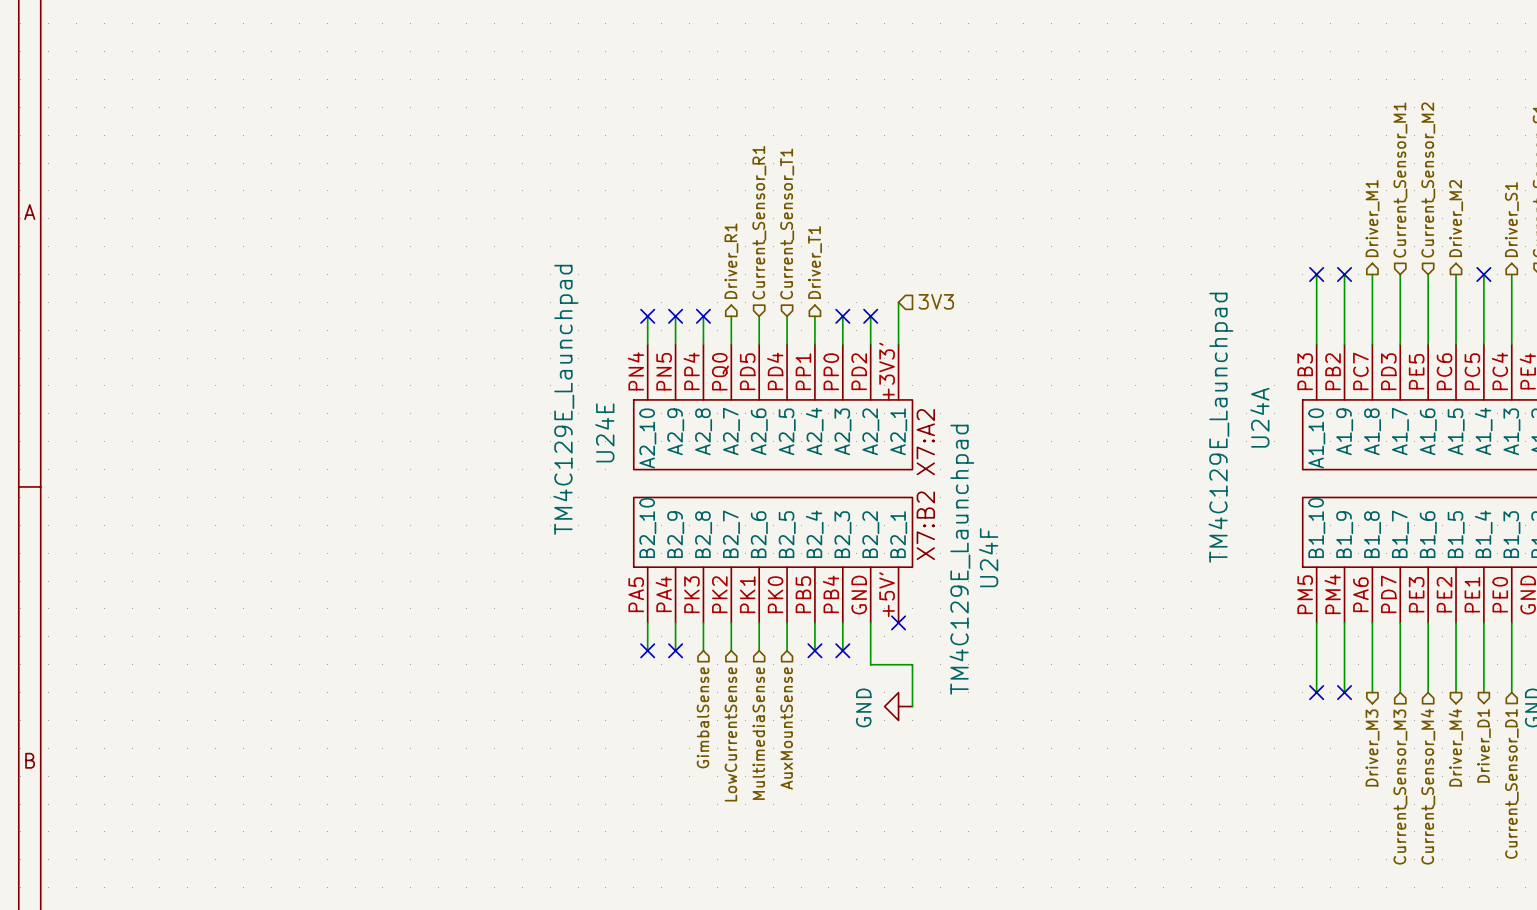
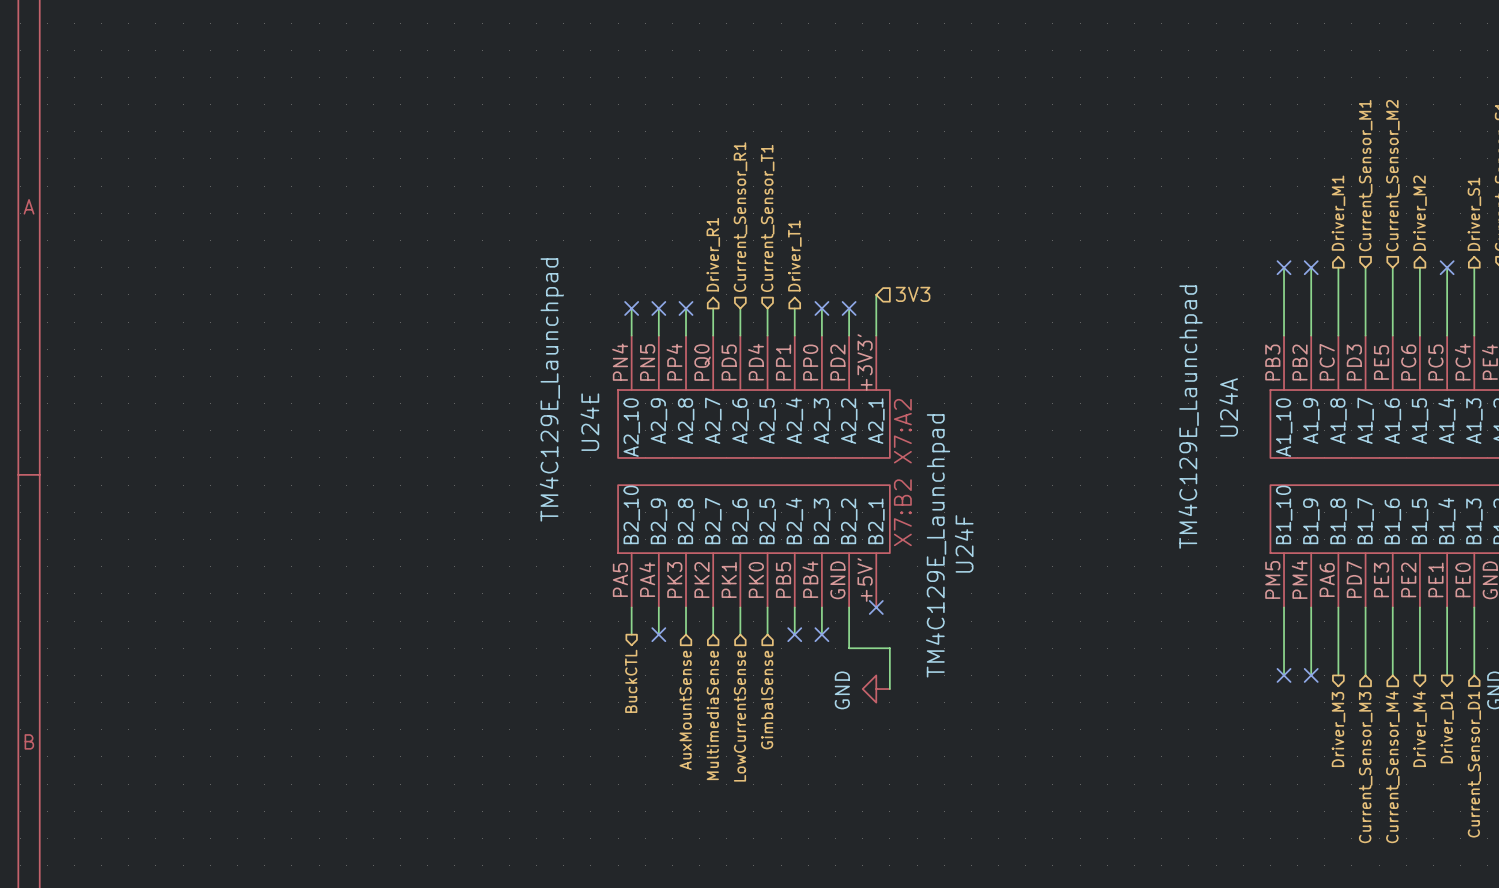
no-connect mark: (647, 650) -> none
hierarchical label: none -> BuckCTL (631, 681)
hierarchical label: GimbalSense (703, 717) -> AuxMountSense (685, 710)
hierarchical label: AuxMountSense (786, 728) -> GimbalSense (767, 700)
hierarchical label: MultimediaSense (758, 733) -> LowCurrentSense (739, 716)
hierarchical label: LowCurrentSense (730, 734) -> MultimediaSense (712, 715)

